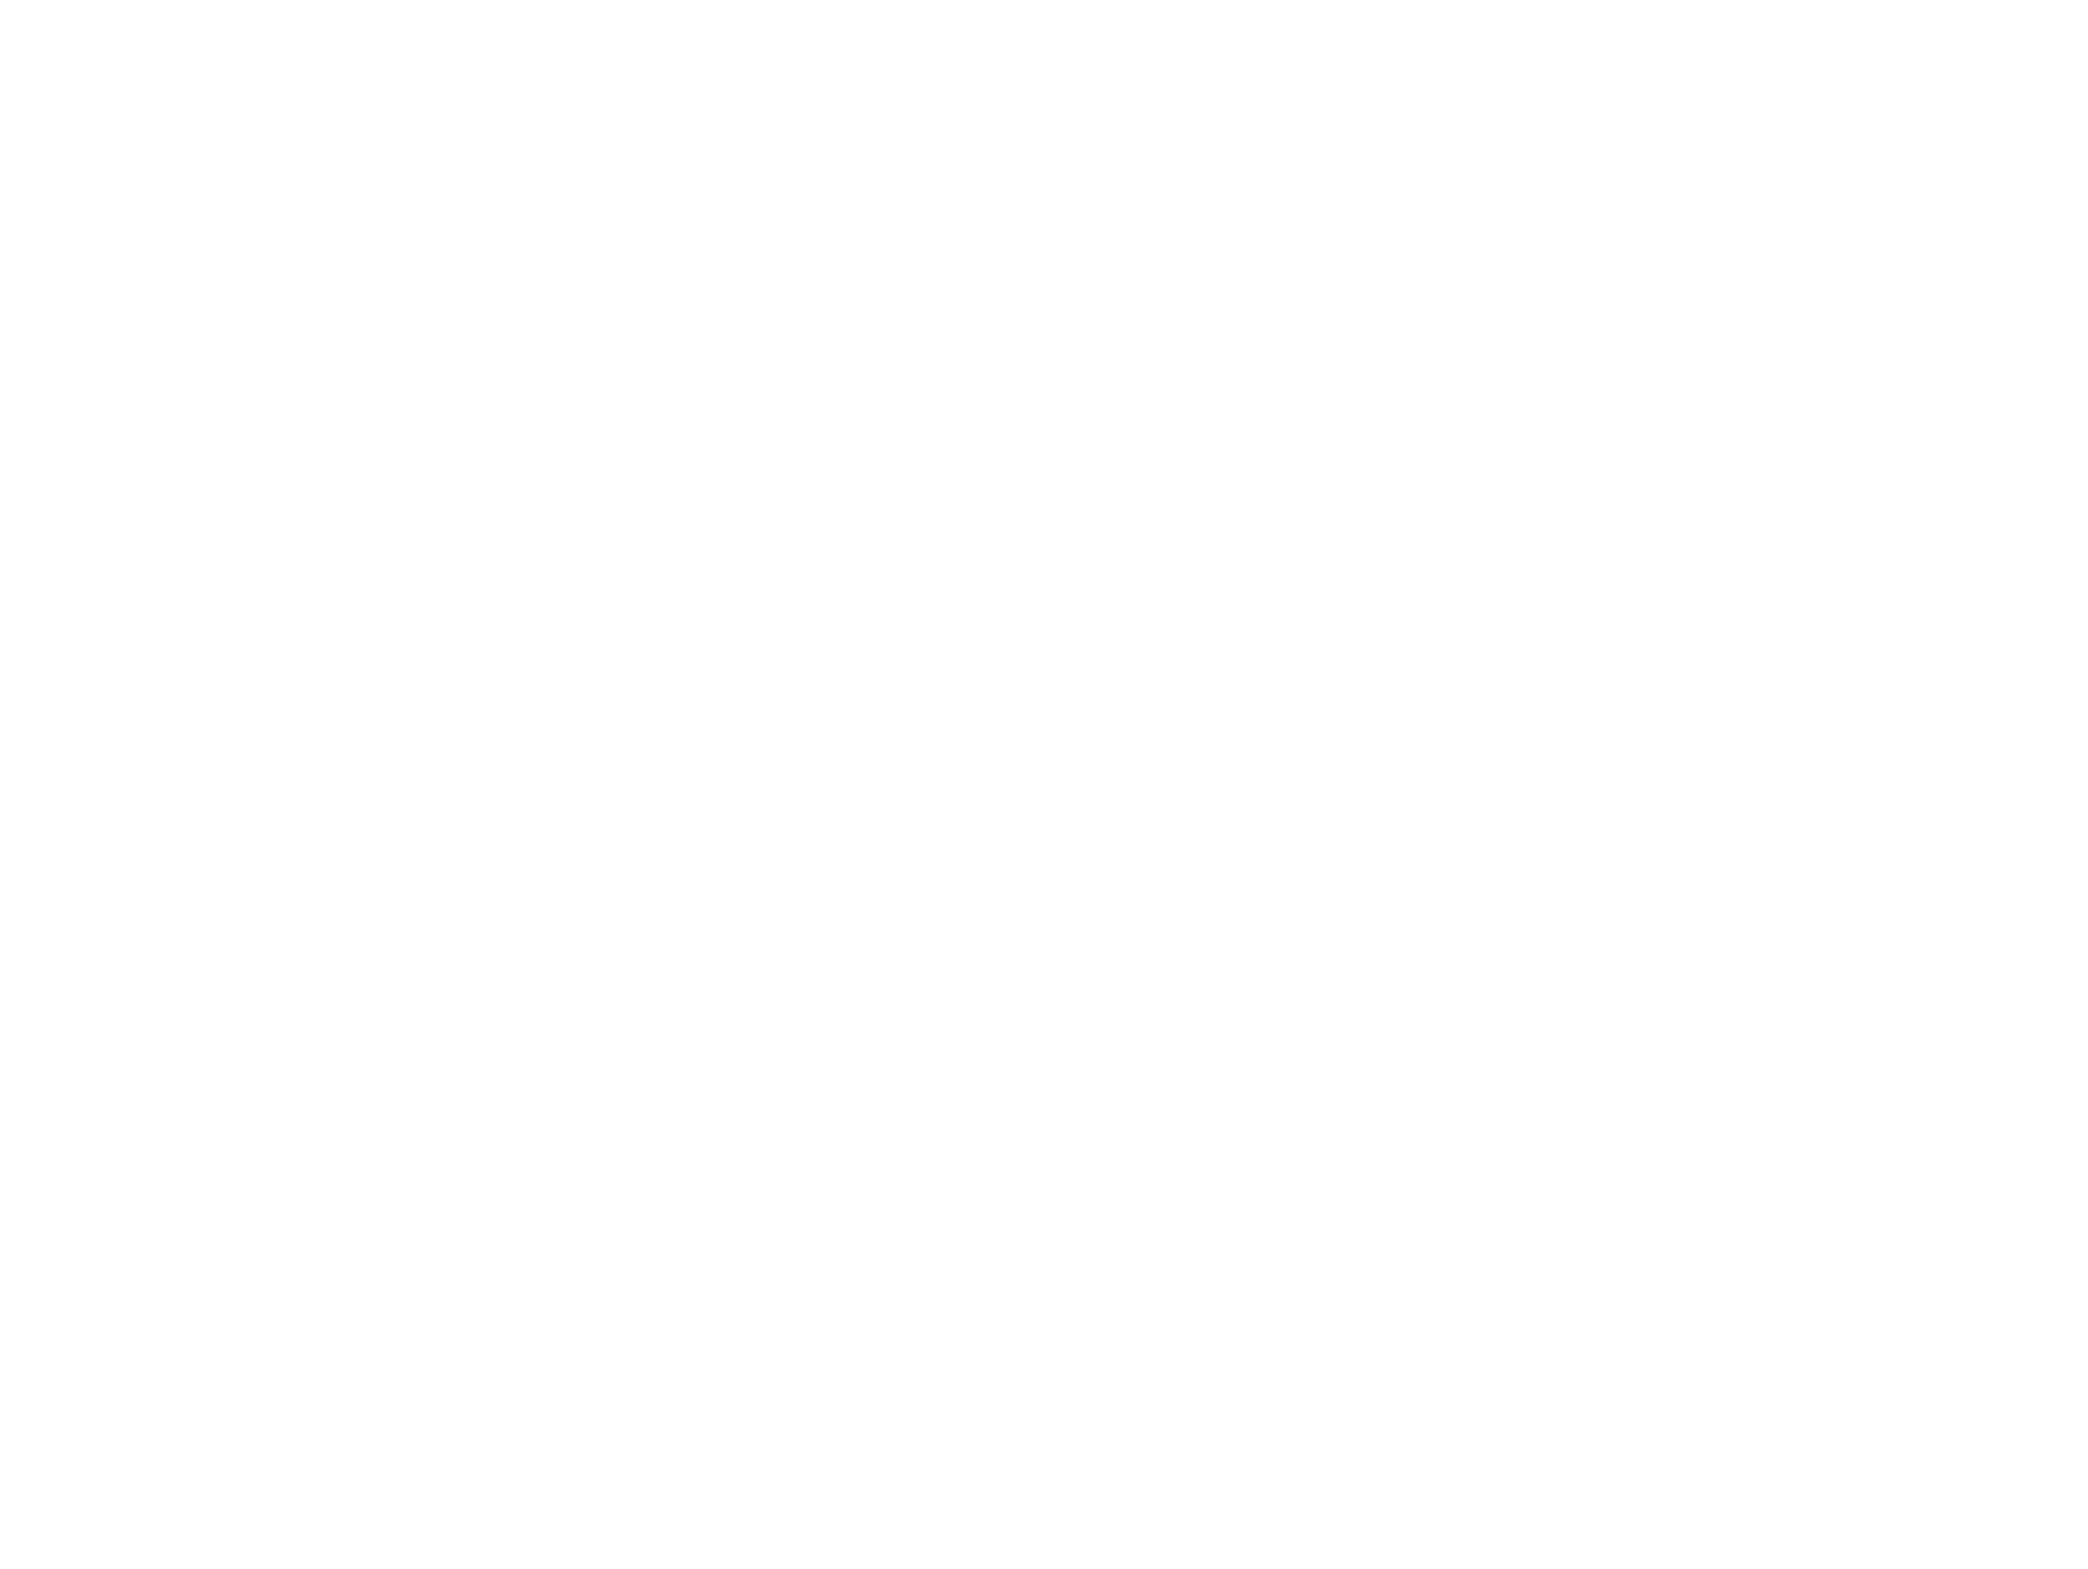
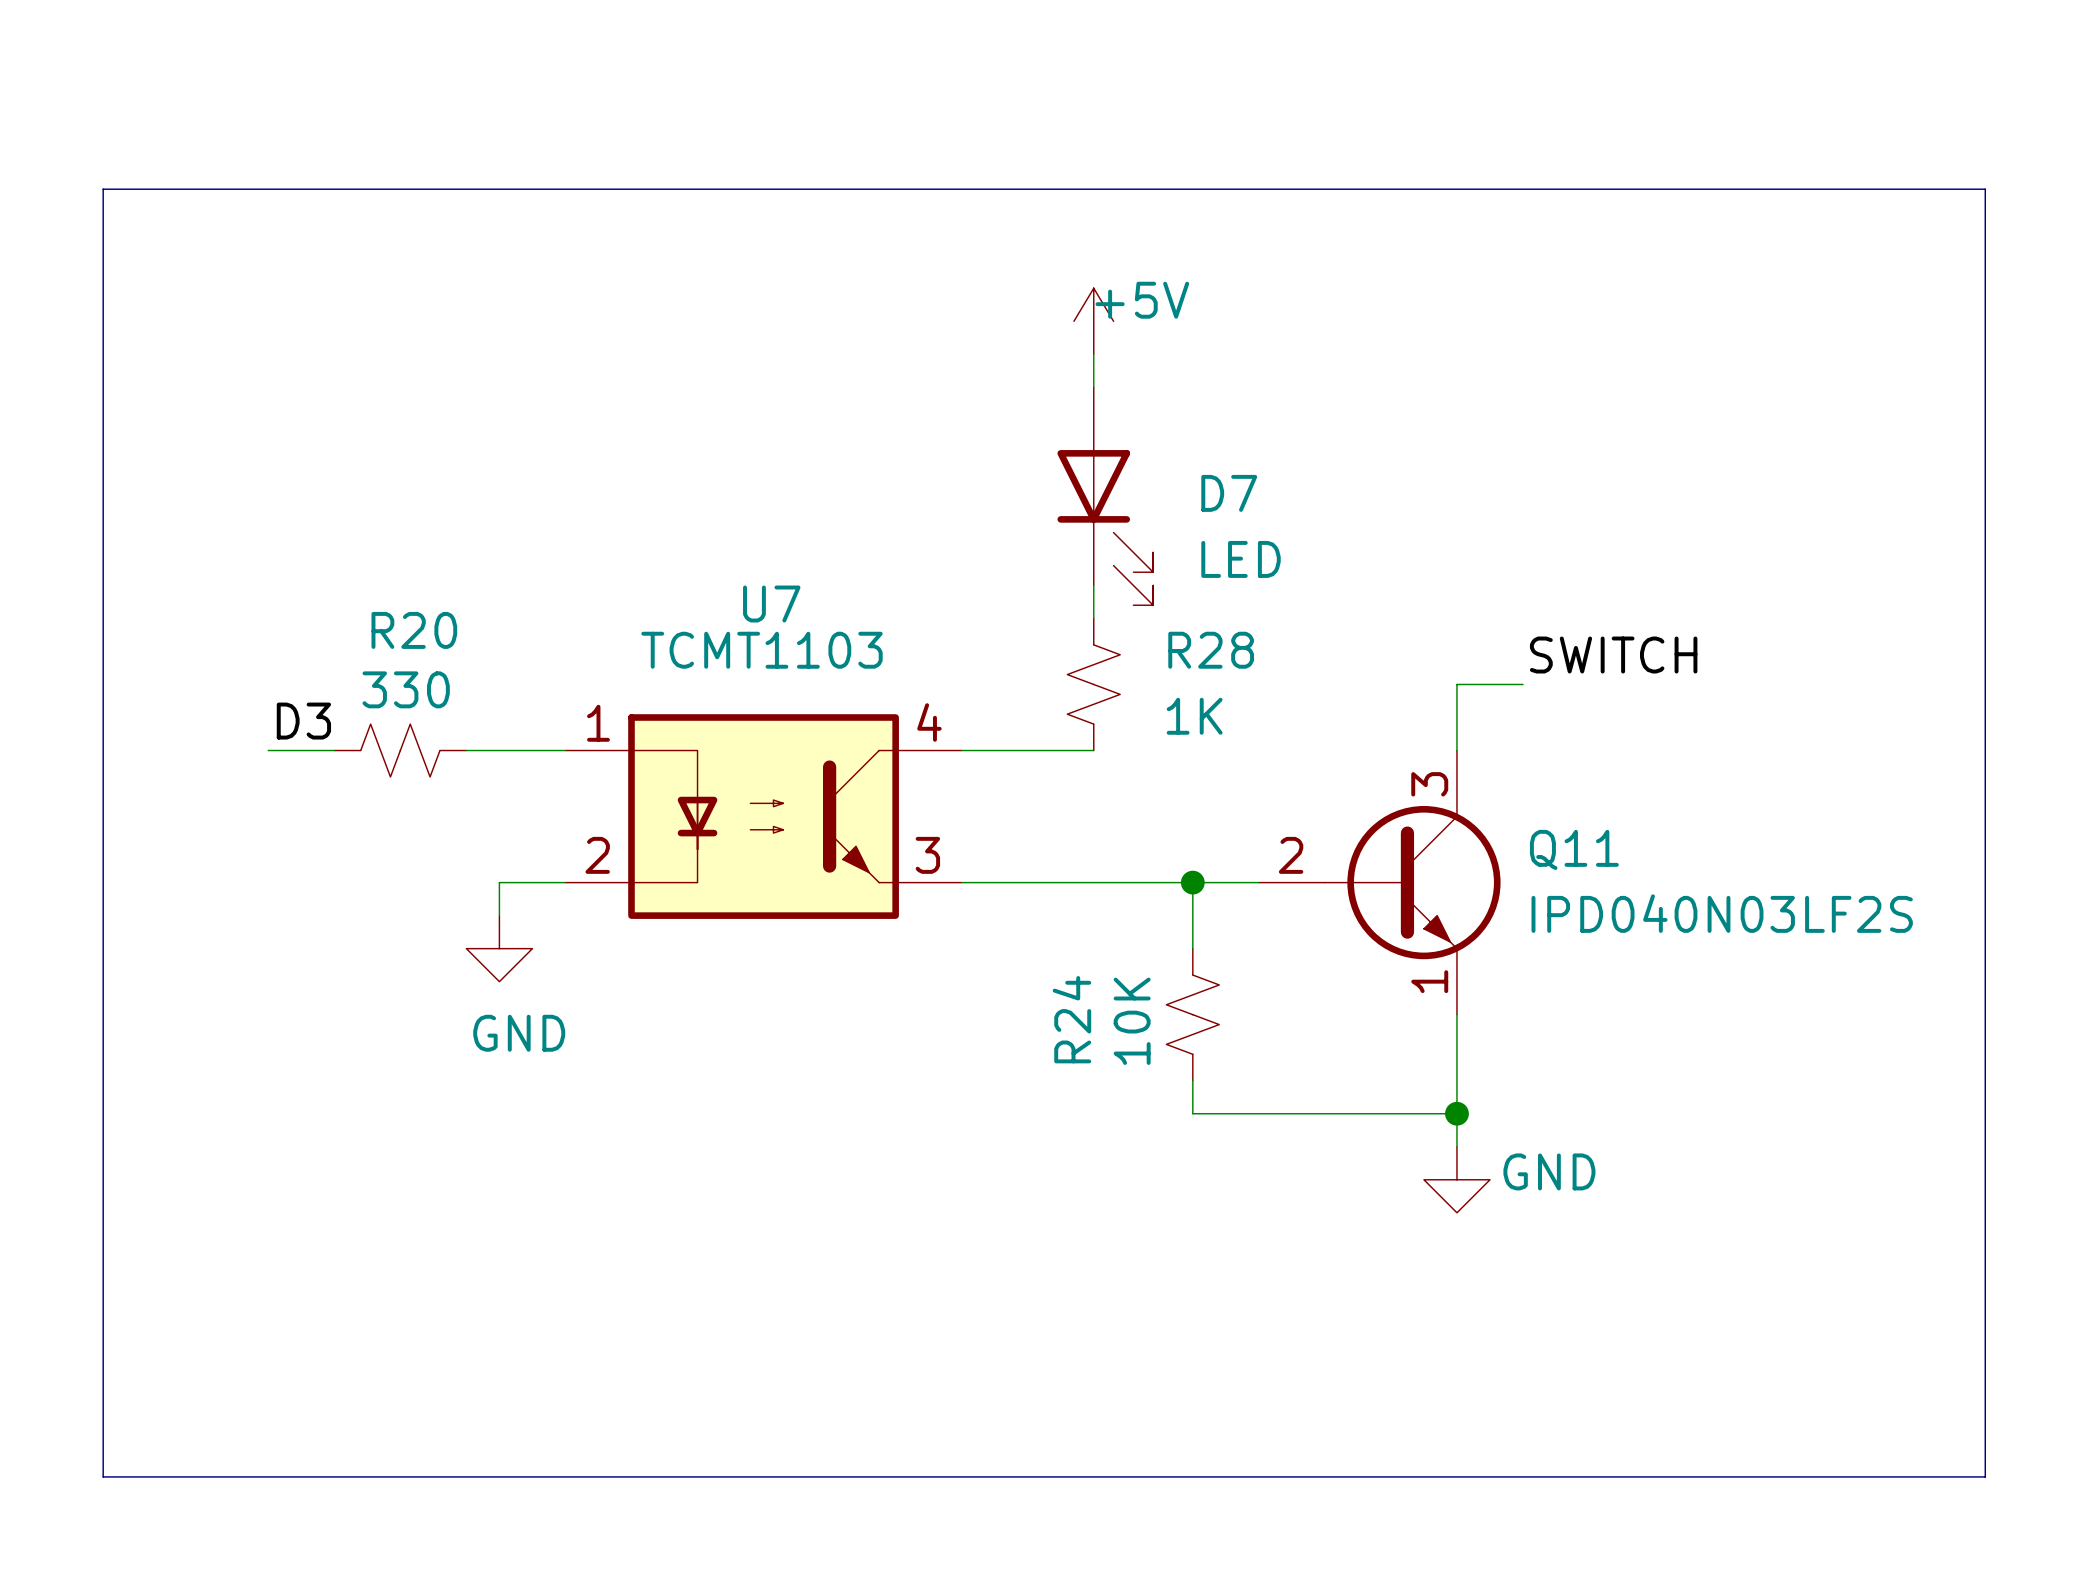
line: none -> (103, 189) (1985, 189) (1985, 1476) (103, 1476) (103, 189)
power symbol: none -> +5V (1093, 321)
wire: none -> (1093, 354) (1093, 387)
D7: none -> LED (1105, 496)
wire: none -> (1093, 585) (1093, 618)
label: none -> SWITCH (1613, 655)
R28: none -> 1K (1093, 684)
wire: none -> (1523, 684) (1456, 684) (1456, 750)
label: none -> D3 (303, 721)
wire: none -> (268, 750) (334, 750)
R20: none -> 330 (400, 750)
wire: none -> (466, 750) (565, 750)
wire: none -> (961, 750) (1093, 750)
U7: none -> TCMT1103 (763, 816)
wire: none -> (565, 882) (499, 882) (499, 915)
wire: none -> (961, 882) (1258, 882)
wire: none -> (1192, 882) (1192, 948)
junction: none -> (1192, 882)
Q11: none -> IPD040N03LF2S (1379, 882)
power symbol: none -> GND (499, 948)
R24: none -> 10K (1192, 1014)
wire: none -> (1456, 1014) (1456, 1146)
wire: none -> (1192, 1080) (1192, 1113) (1456, 1113)
junction: none -> (1456, 1113)
power symbol: none -> GND (1456, 1179)

